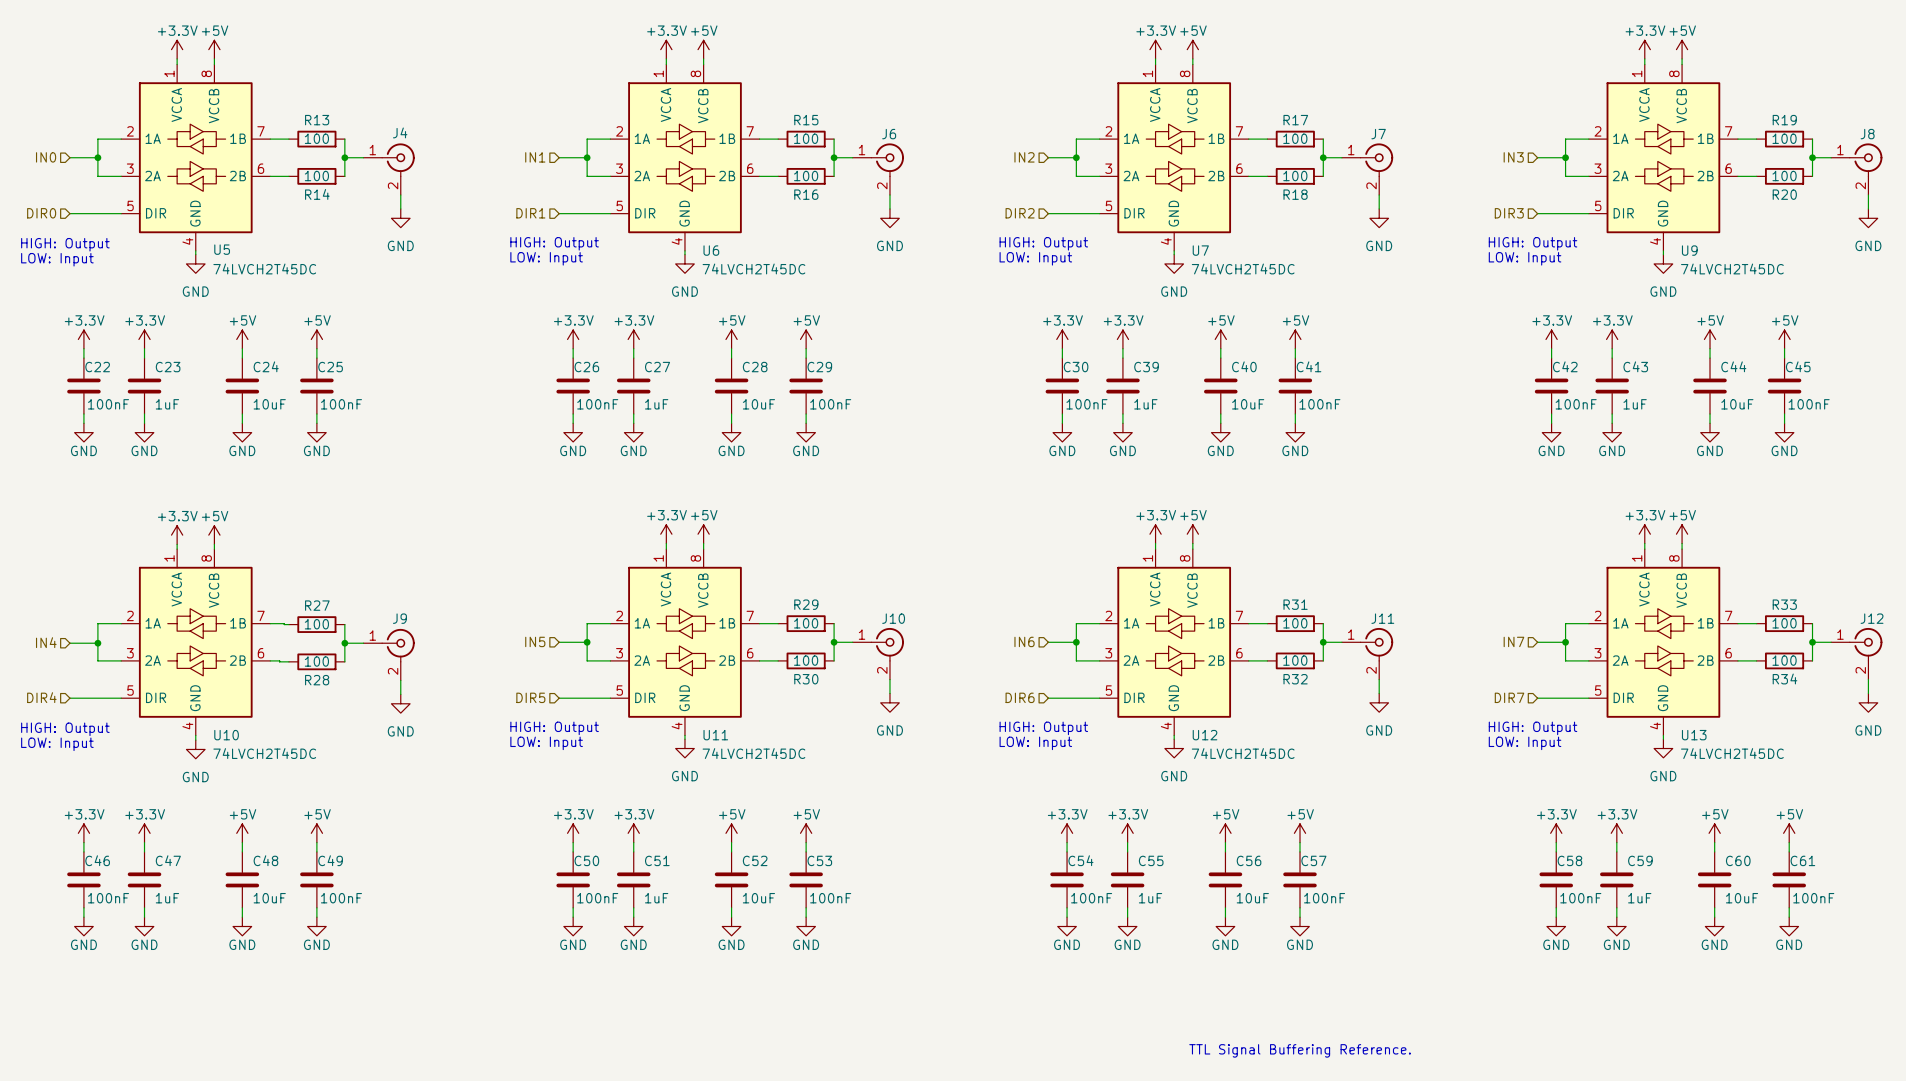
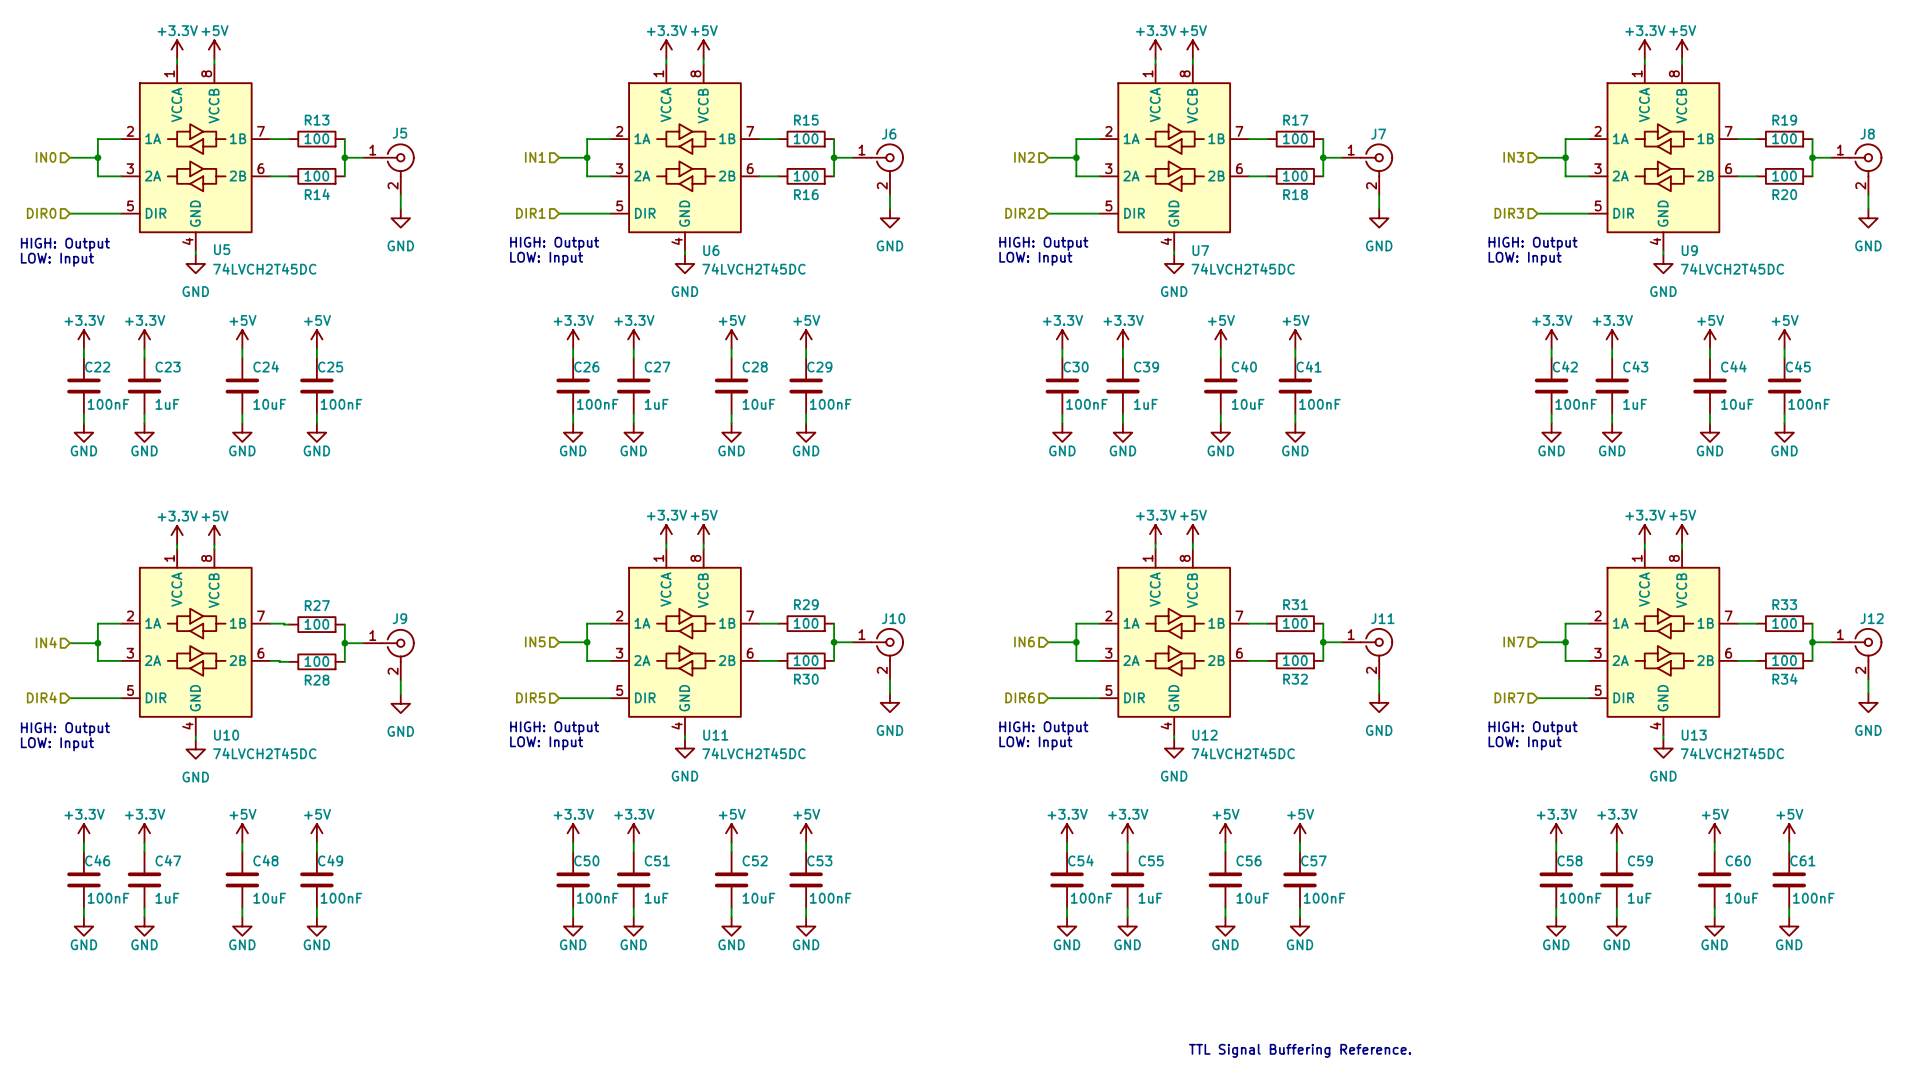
J4 name: J4 (400, 132) -> J5 (399, 133)

